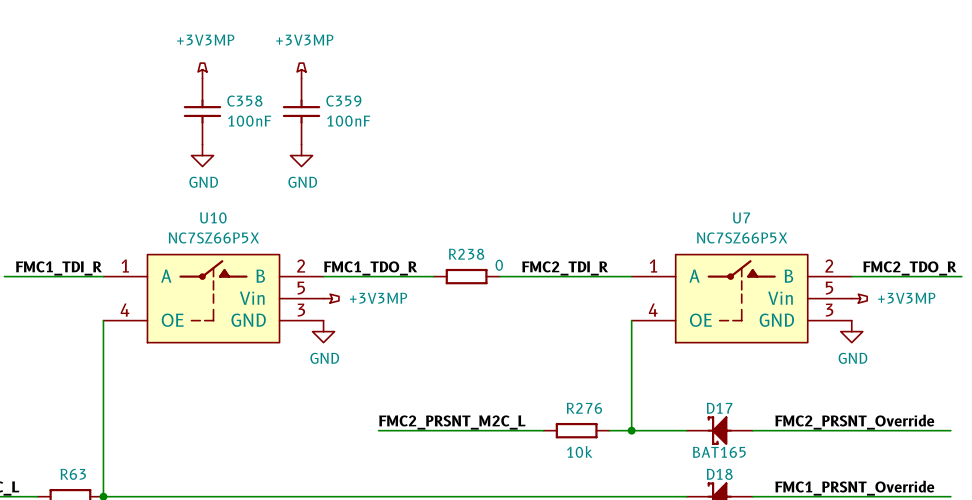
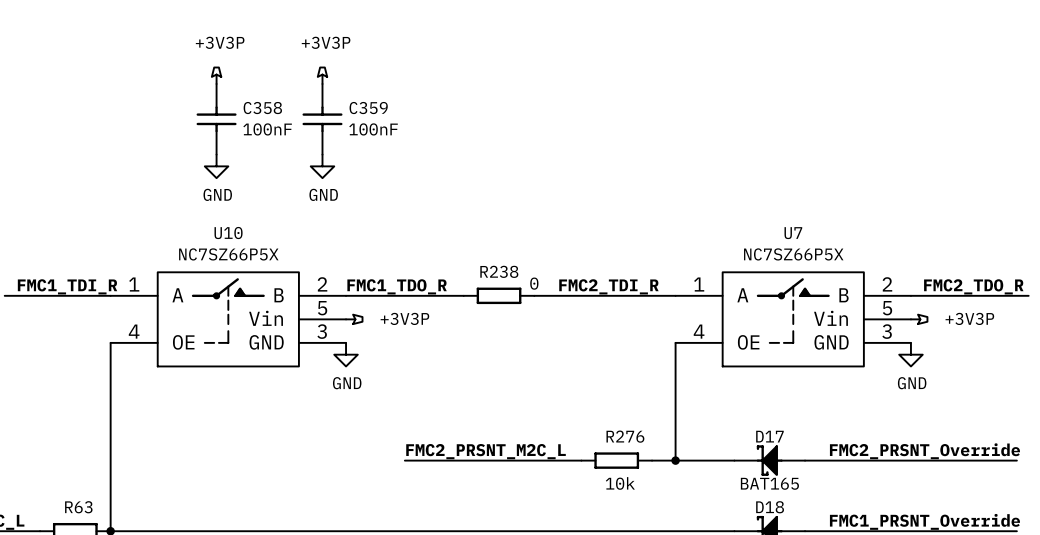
power symbol: +3V3MP (202, 70) -> +3V3P (216, 75)
power symbol: +3V3MP (301, 70) -> +3V3P (322, 75)
power symbol: +3V3MP (331, 298) -> +3V3P (354, 319)
power symbol: +3V3MP (859, 298) -> +3V3P (919, 319)

